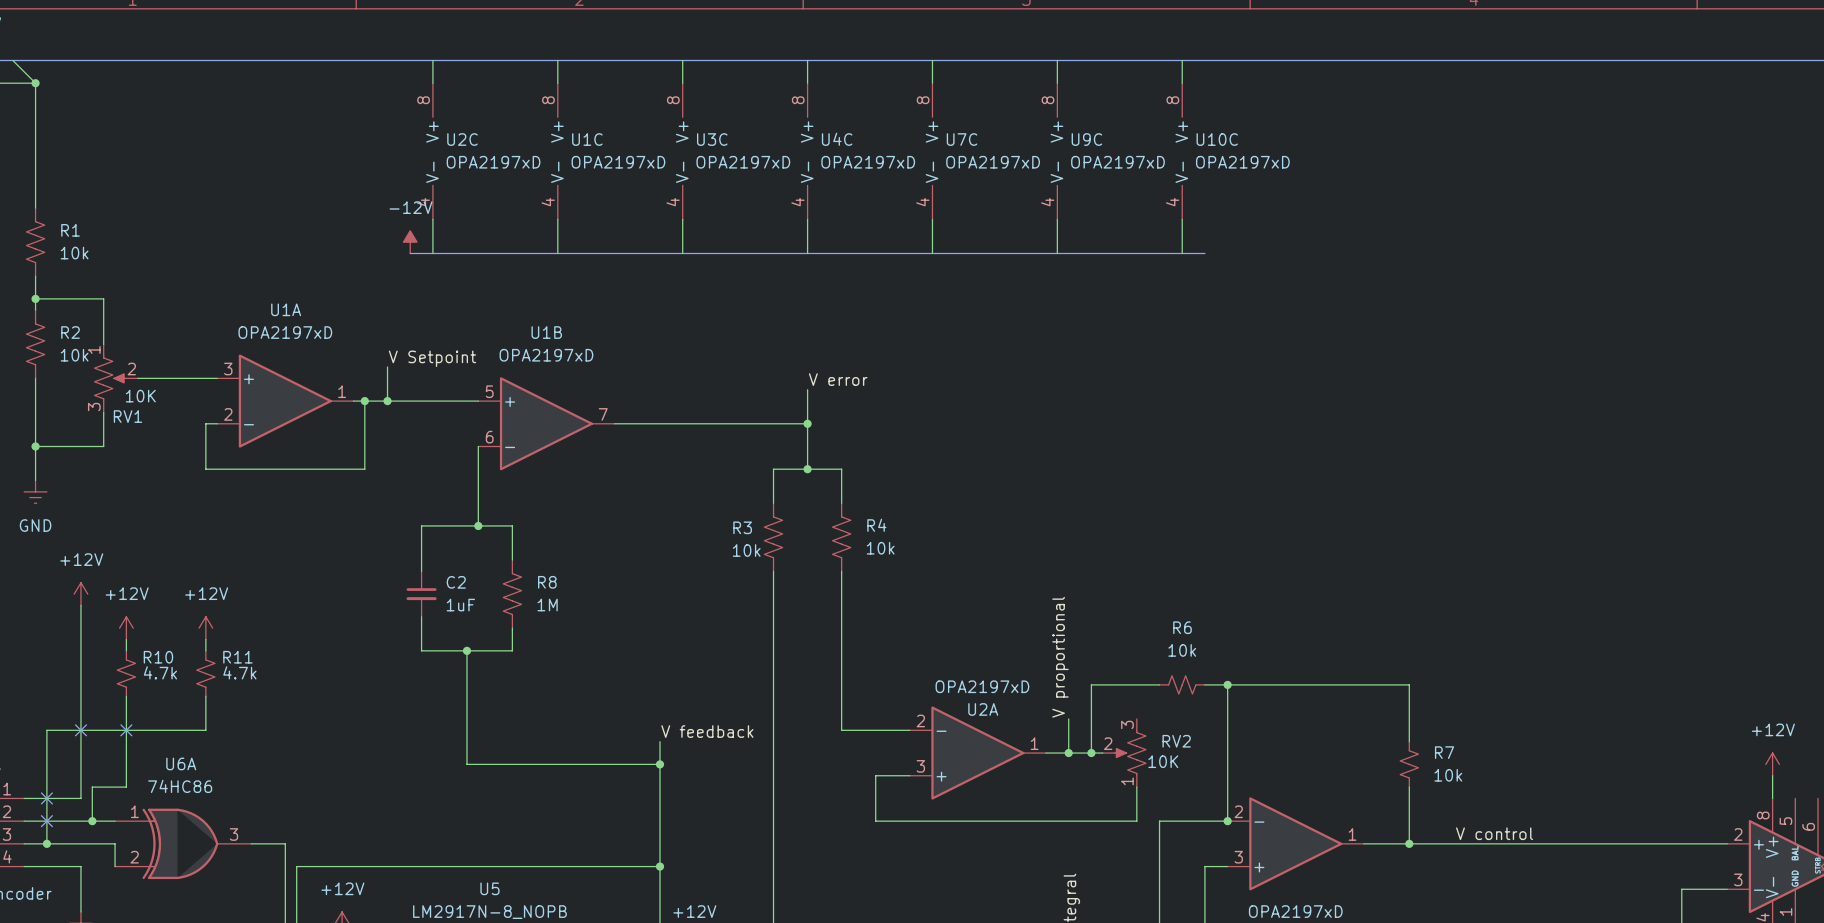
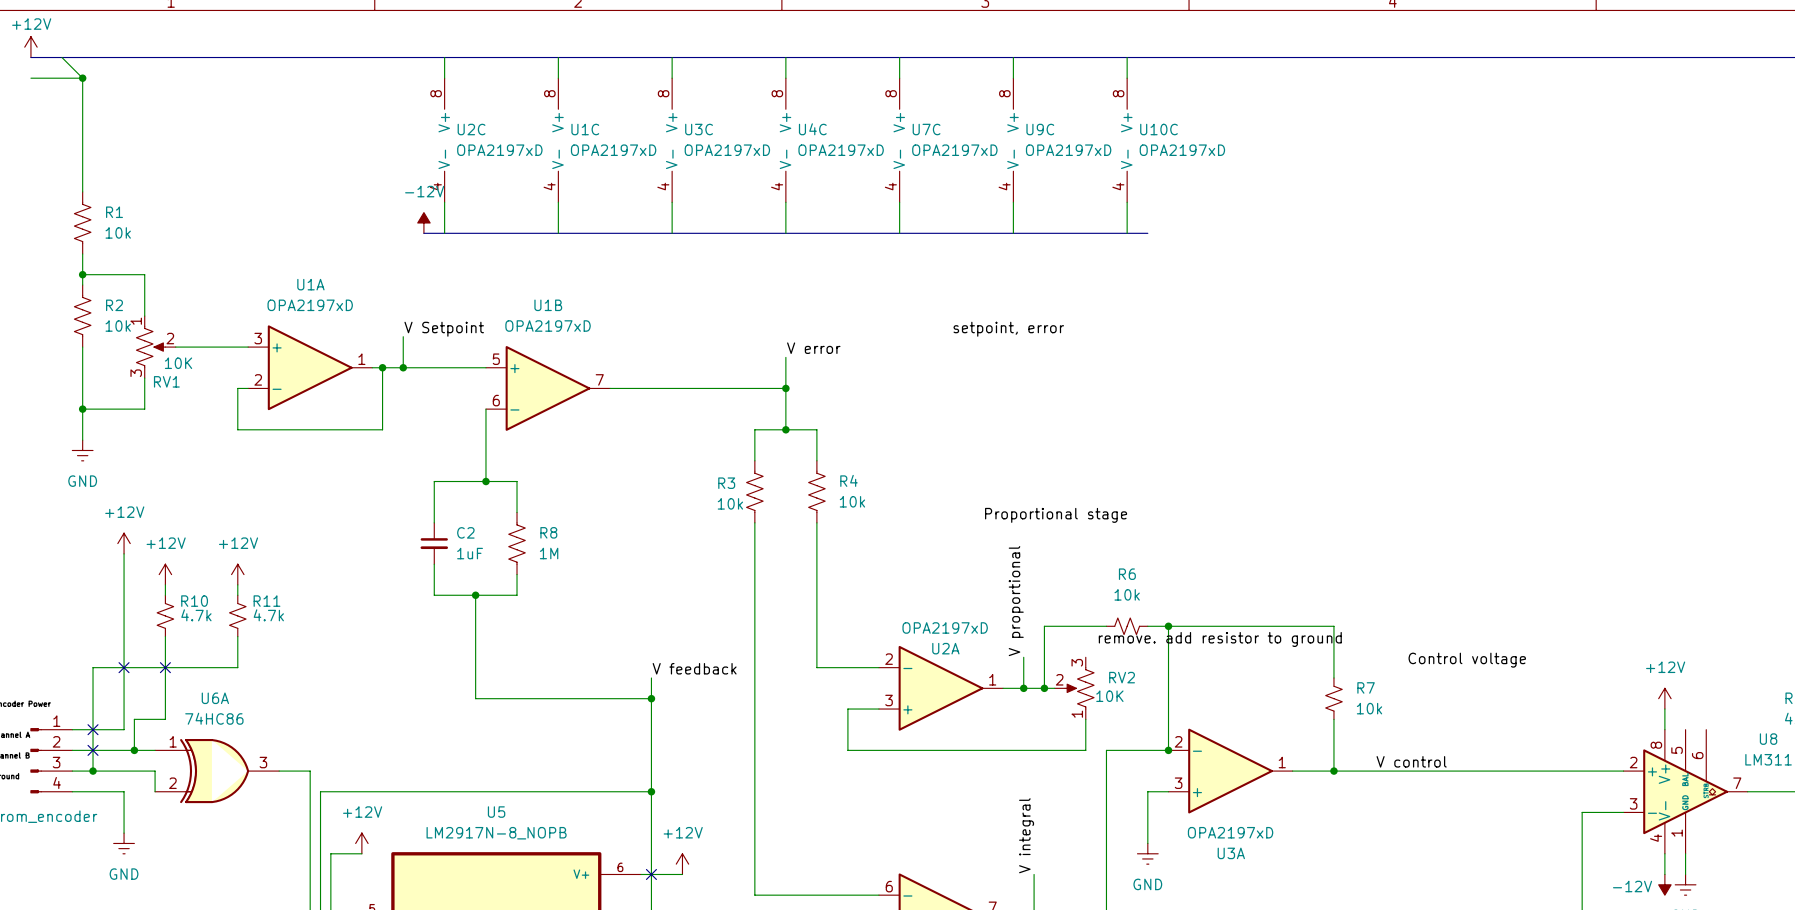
label: none -> setpoint, error (1008, 329)
label: none -> Proportional stage (1056, 515)
label: none -> remove. add resistor to ground (1220, 639)
label: none -> Control voltage (1467, 660)

